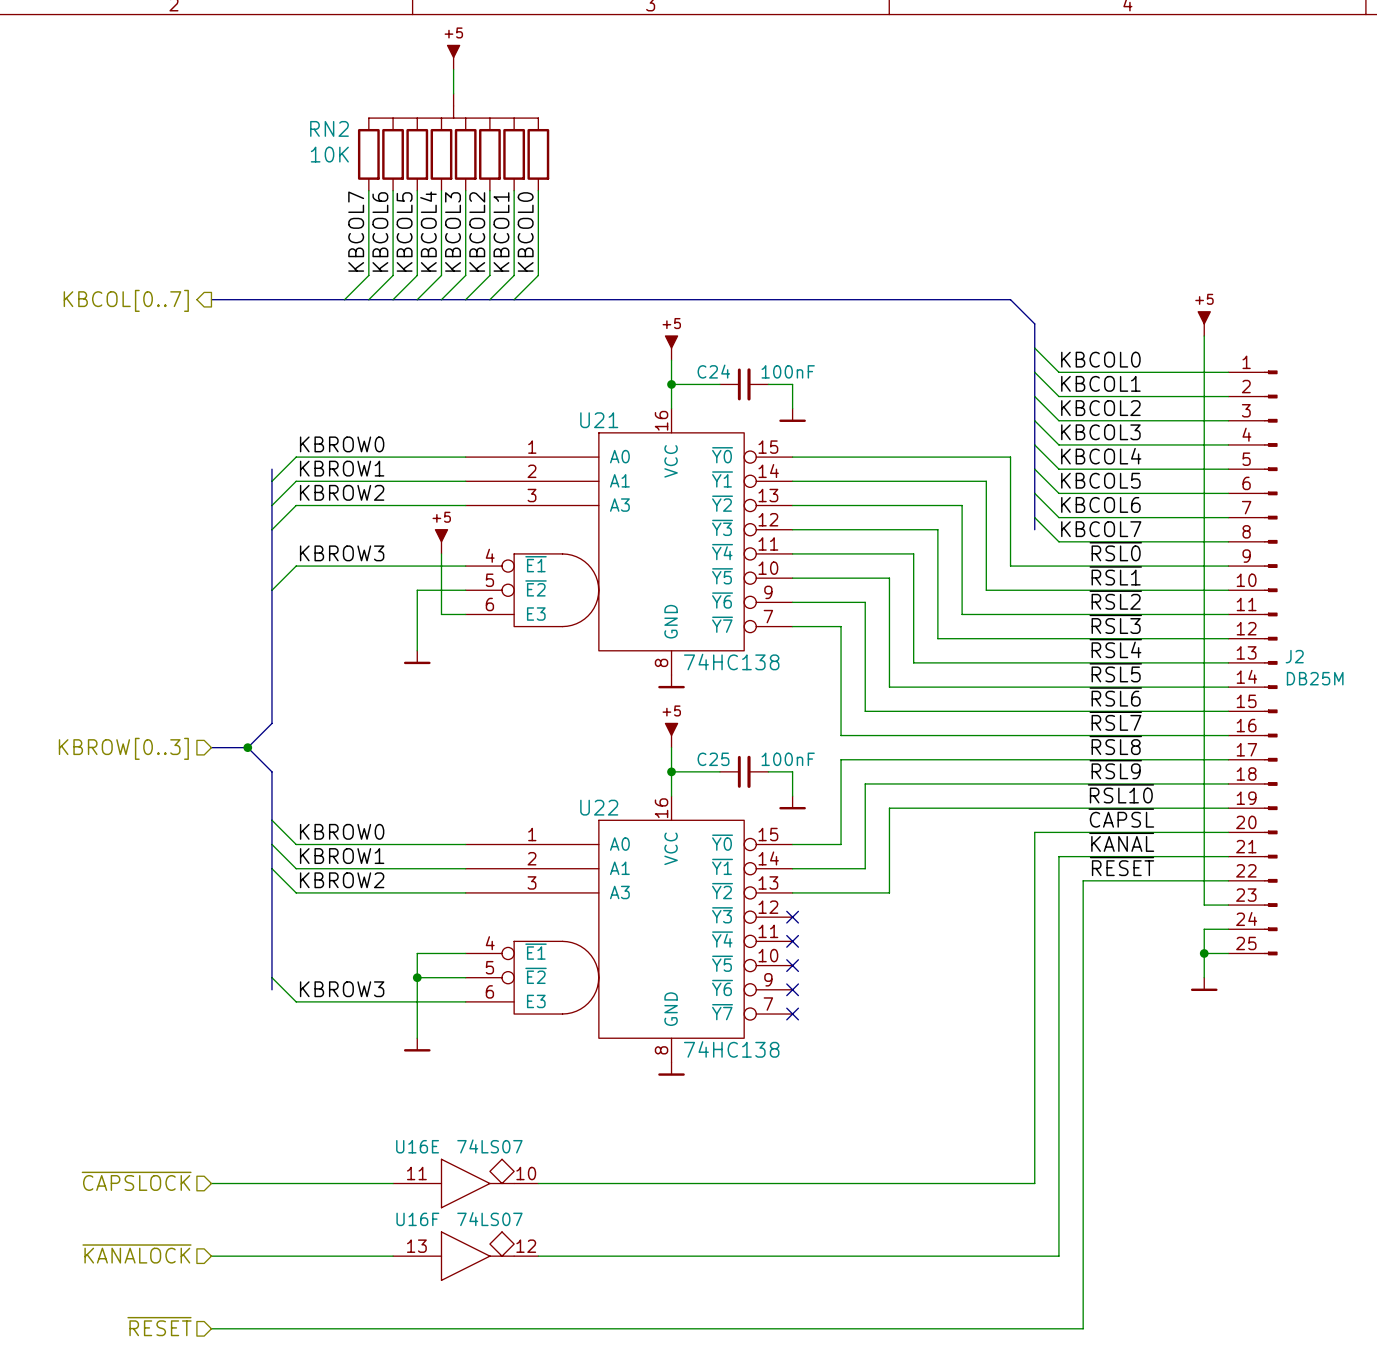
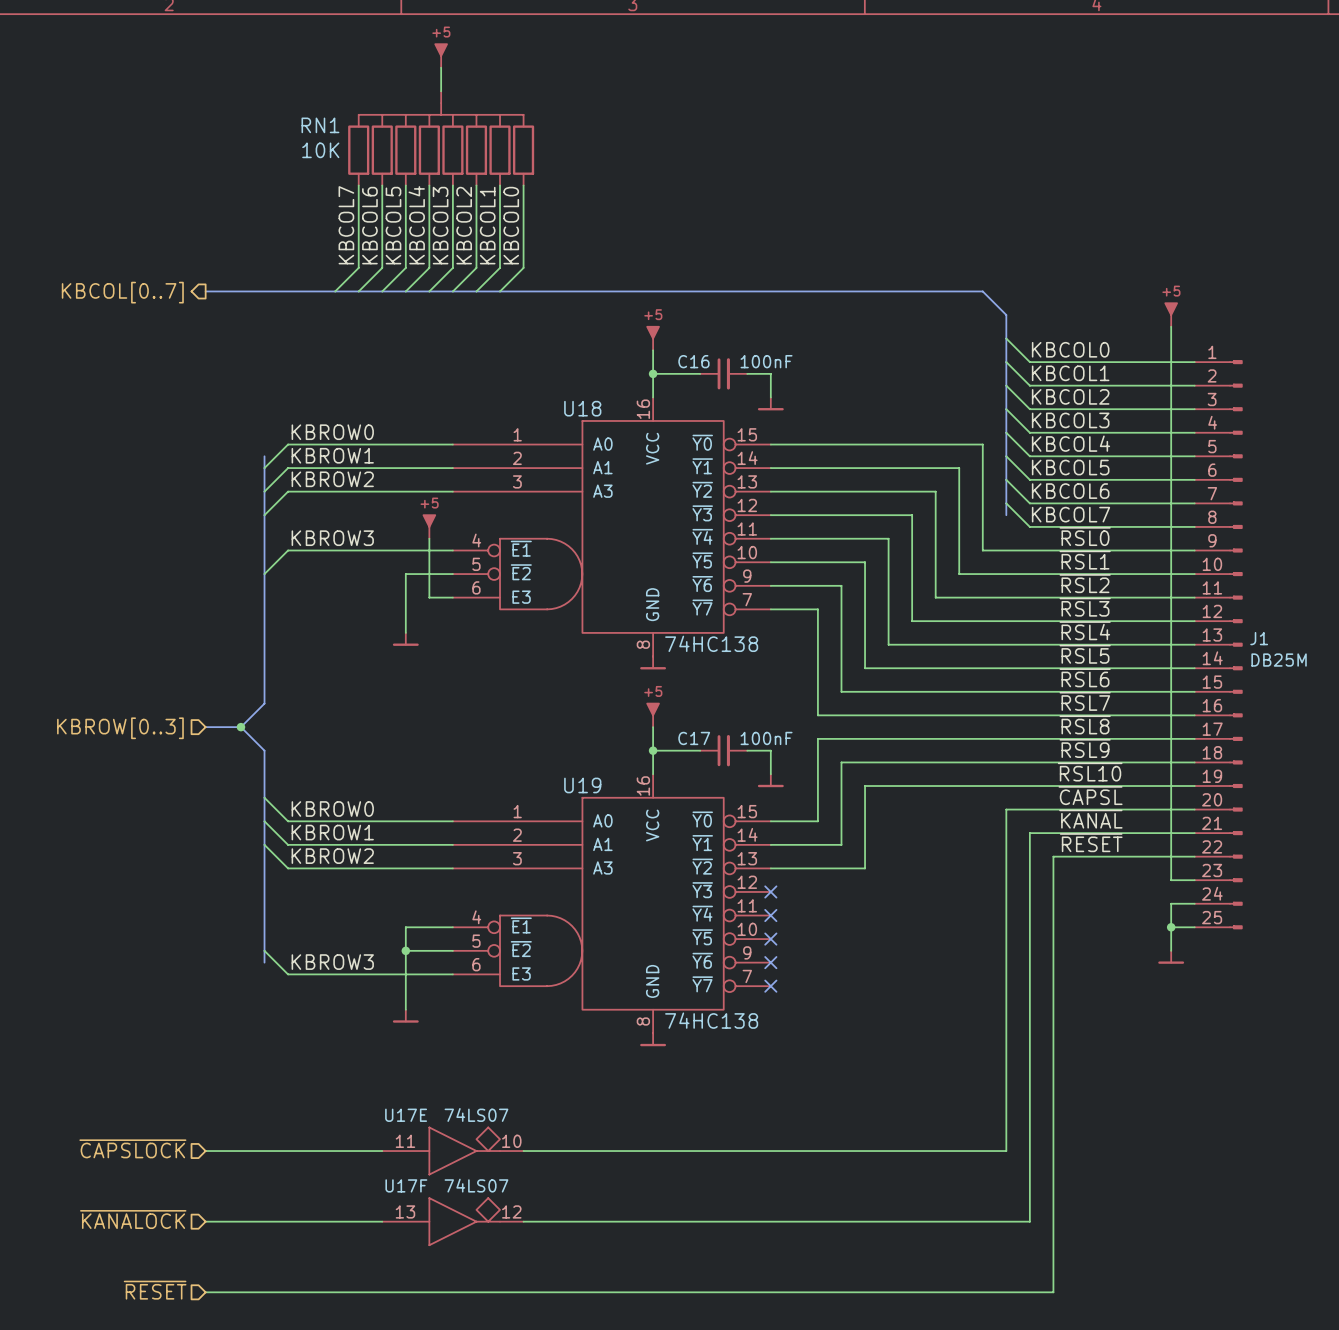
RN2 name: RN2 (329, 128) -> RN1 (320, 125)
C24 name: C24 (713, 371) -> C16 (693, 361)
U21 name: U21 (599, 420) -> U18 (582, 408)
J2 name: J2 (1294, 656) -> J1 (1259, 638)
C25 name: C25 (713, 759) -> C17 (694, 738)
U22 name: U22 (599, 807) -> U19 (582, 785)
U16E name: U16E (417, 1146) -> U17E (406, 1115)
U16F name: U16F (417, 1219) -> U17F (406, 1185)

